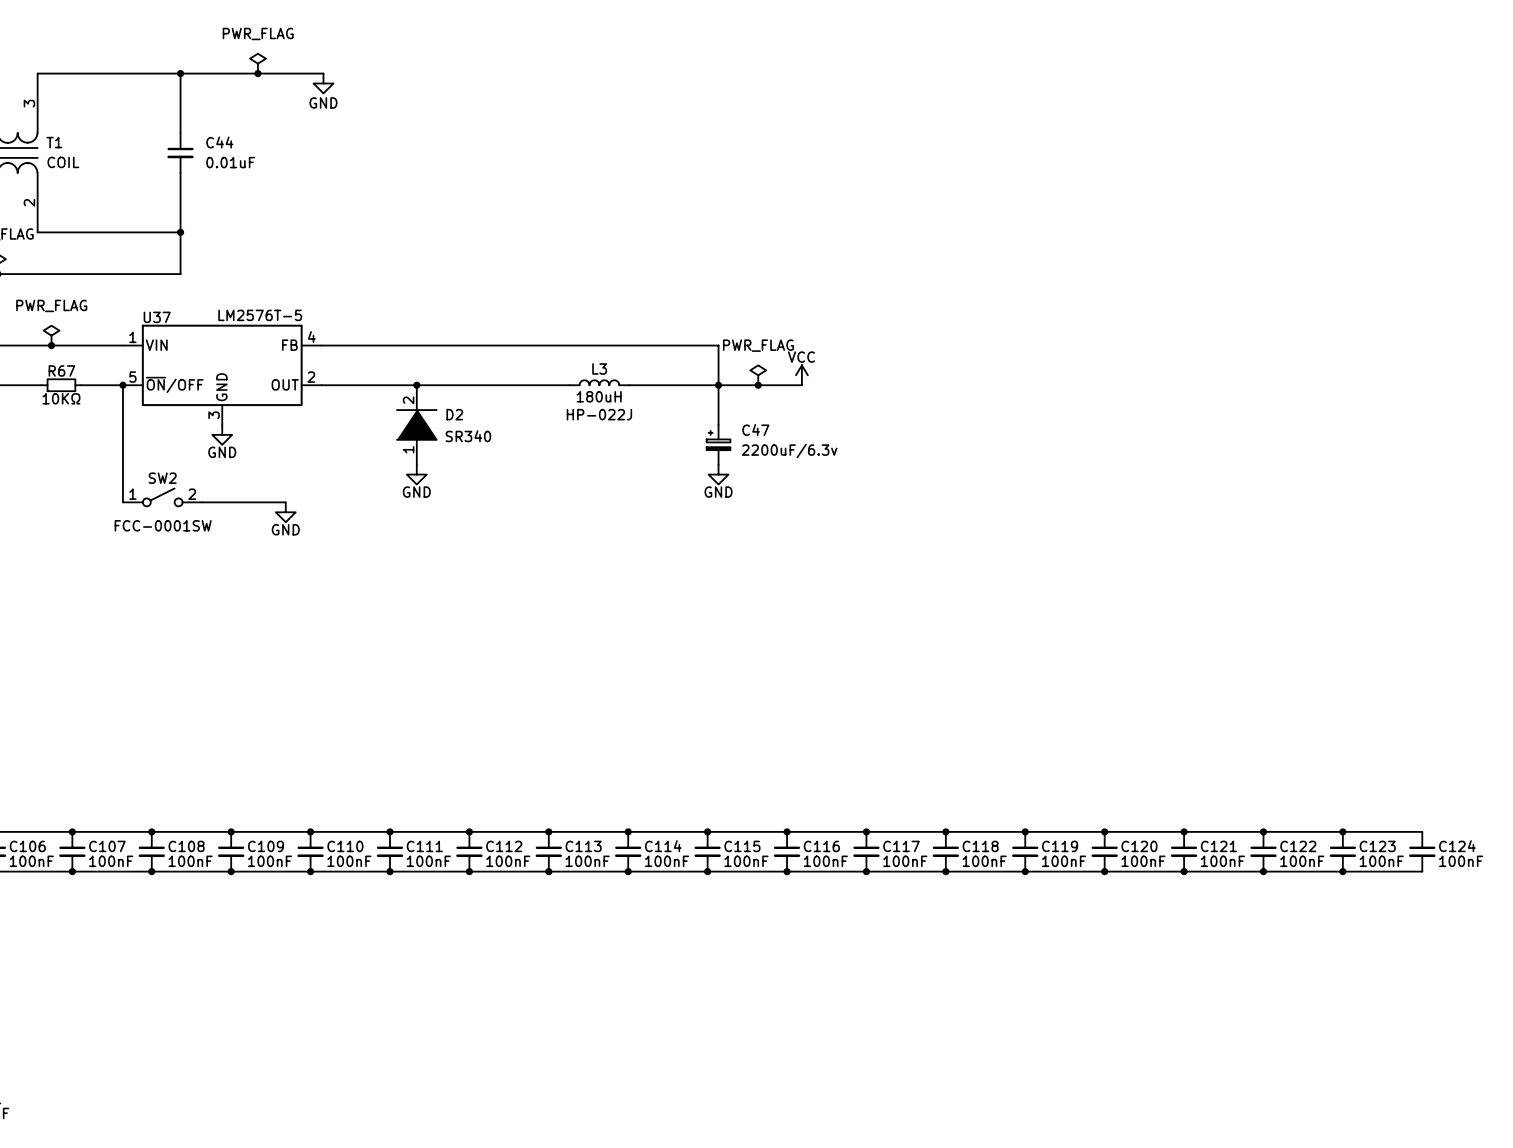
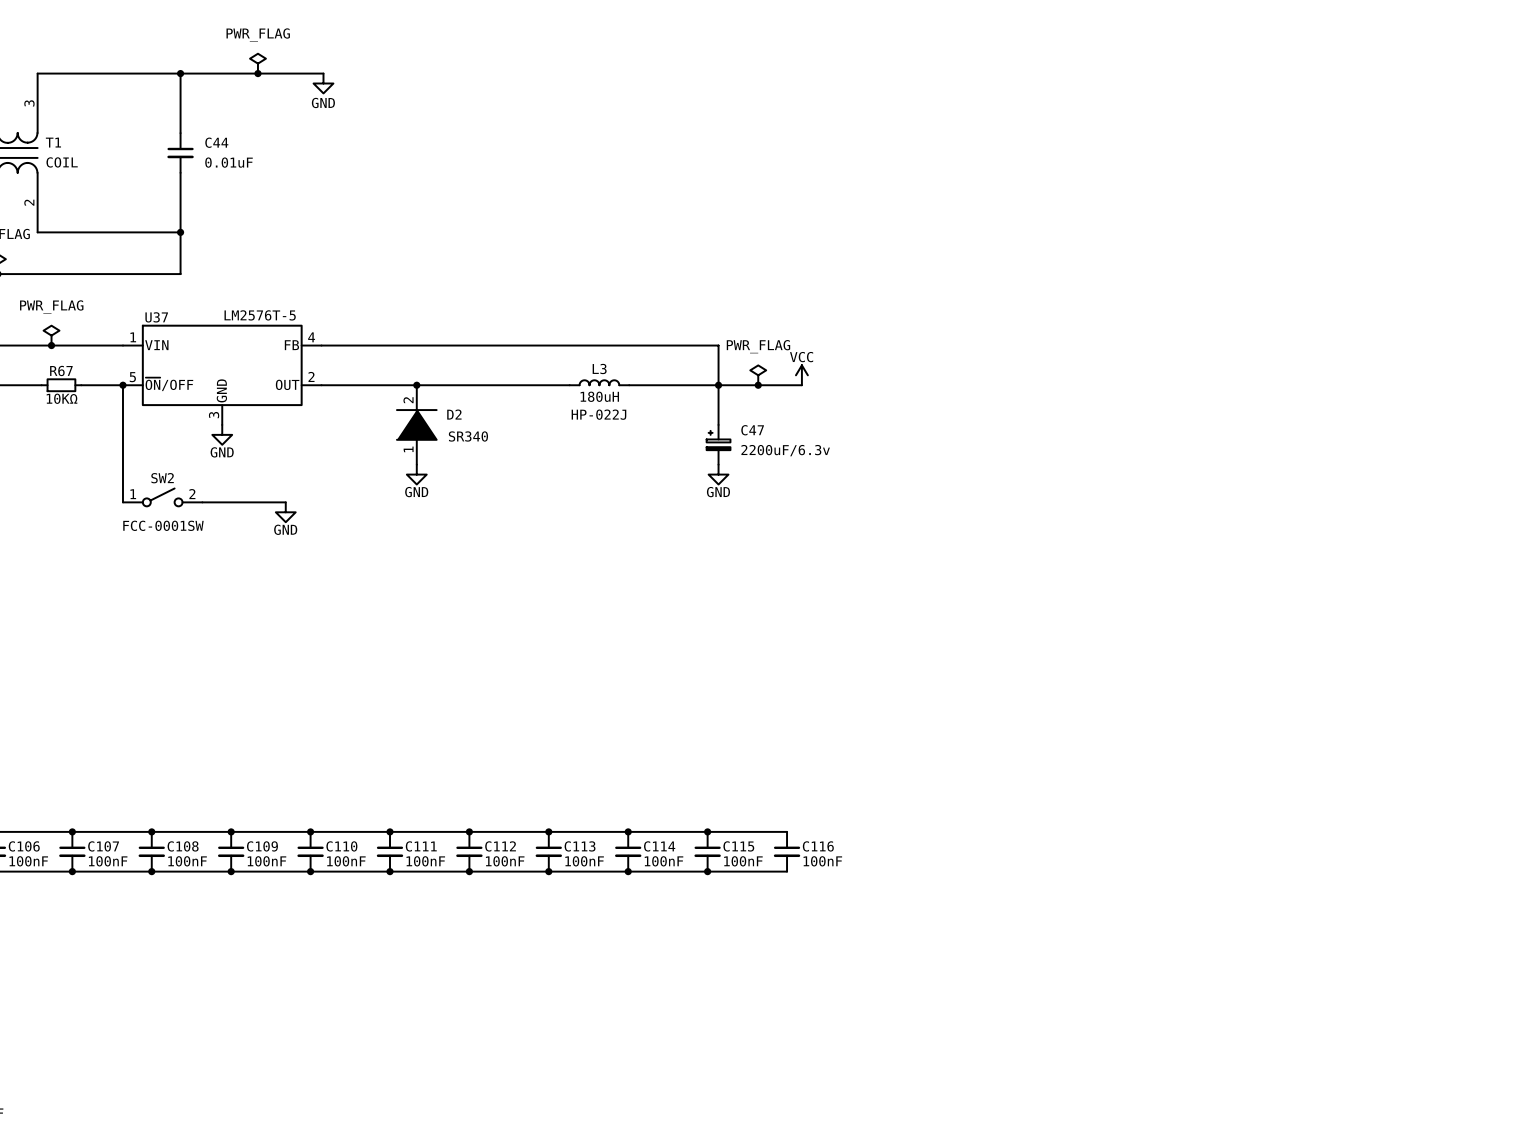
wire: (787, 831) (1422, 831) -> none
junction: (787, 831) -> none
junction: (866, 831) -> none
junction: (945, 831) -> none
junction: (1025, 831) -> none
junction: (1104, 831) -> none
junction: (1184, 831) -> none
junction: (1263, 831) -> none
junction: (1342, 831) -> none
C117: 100nF (866, 851) -> none
C118: 100nF (945, 851) -> none
C119: 100nF (1025, 851) -> none
C120: 100nF (1104, 851) -> none
C121: 100nF (1184, 851) -> none
C122: 100nF (1263, 851) -> none
C123: 100nF (1342, 851) -> none
C124: 100nF (1422, 851) -> none
wire: (787, 871) (1422, 871) -> none
junction: (787, 871) -> none
junction: (866, 871) -> none
junction: (945, 871) -> none
junction: (1025, 871) -> none
junction: (1104, 871) -> none
junction: (1184, 871) -> none
junction: (1263, 871) -> none
junction: (1342, 871) -> none

